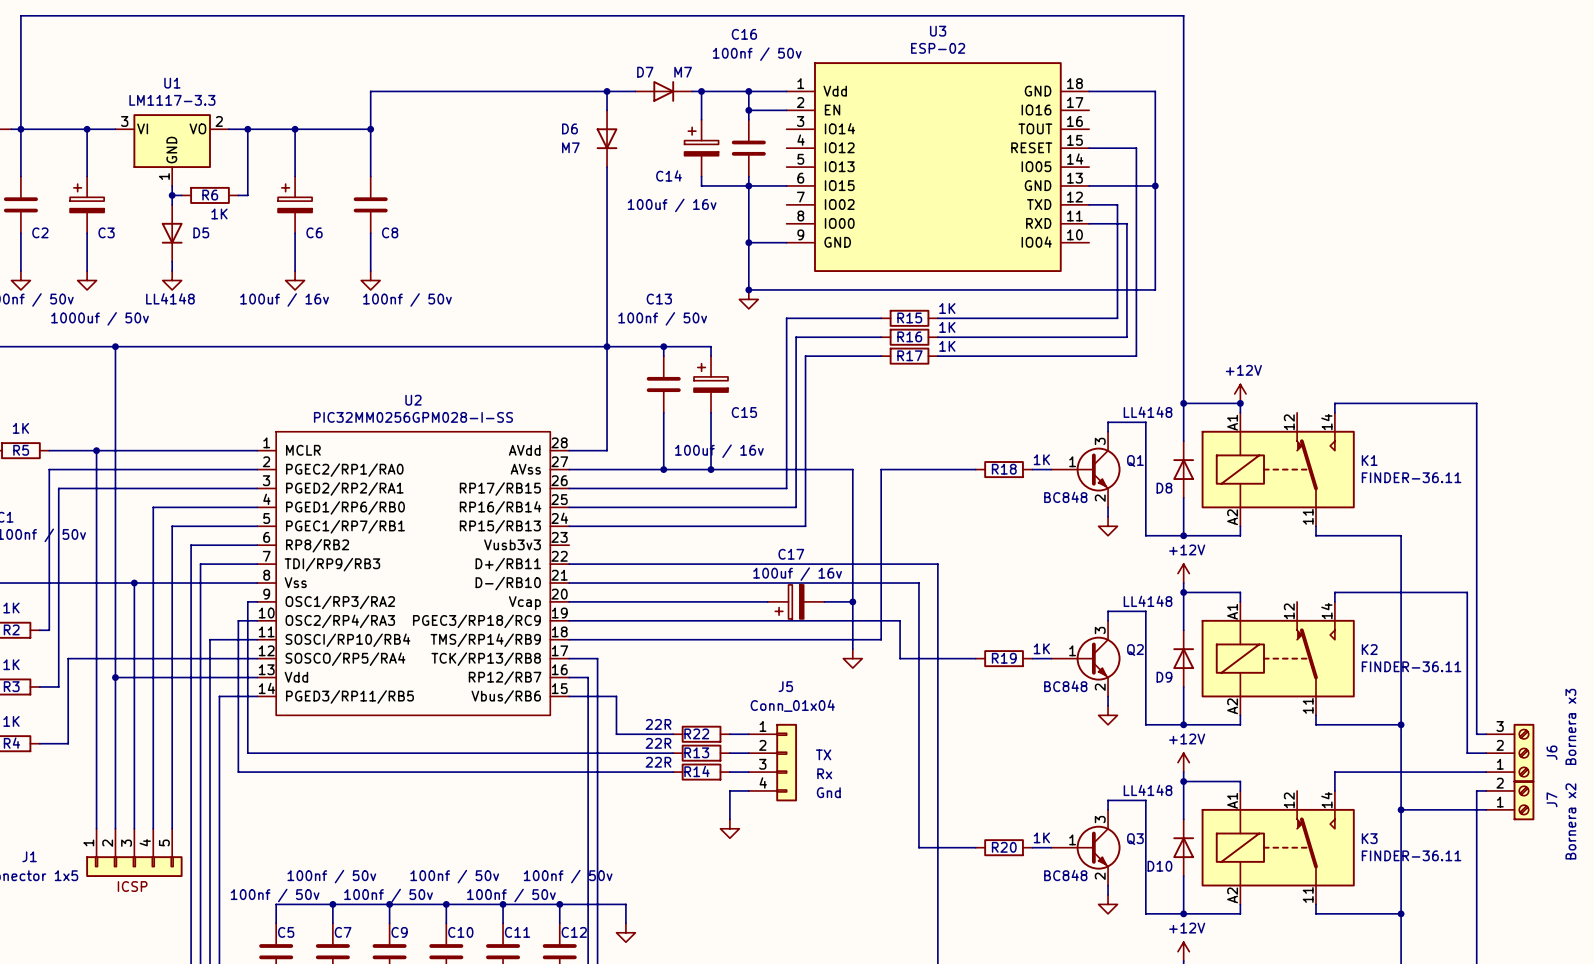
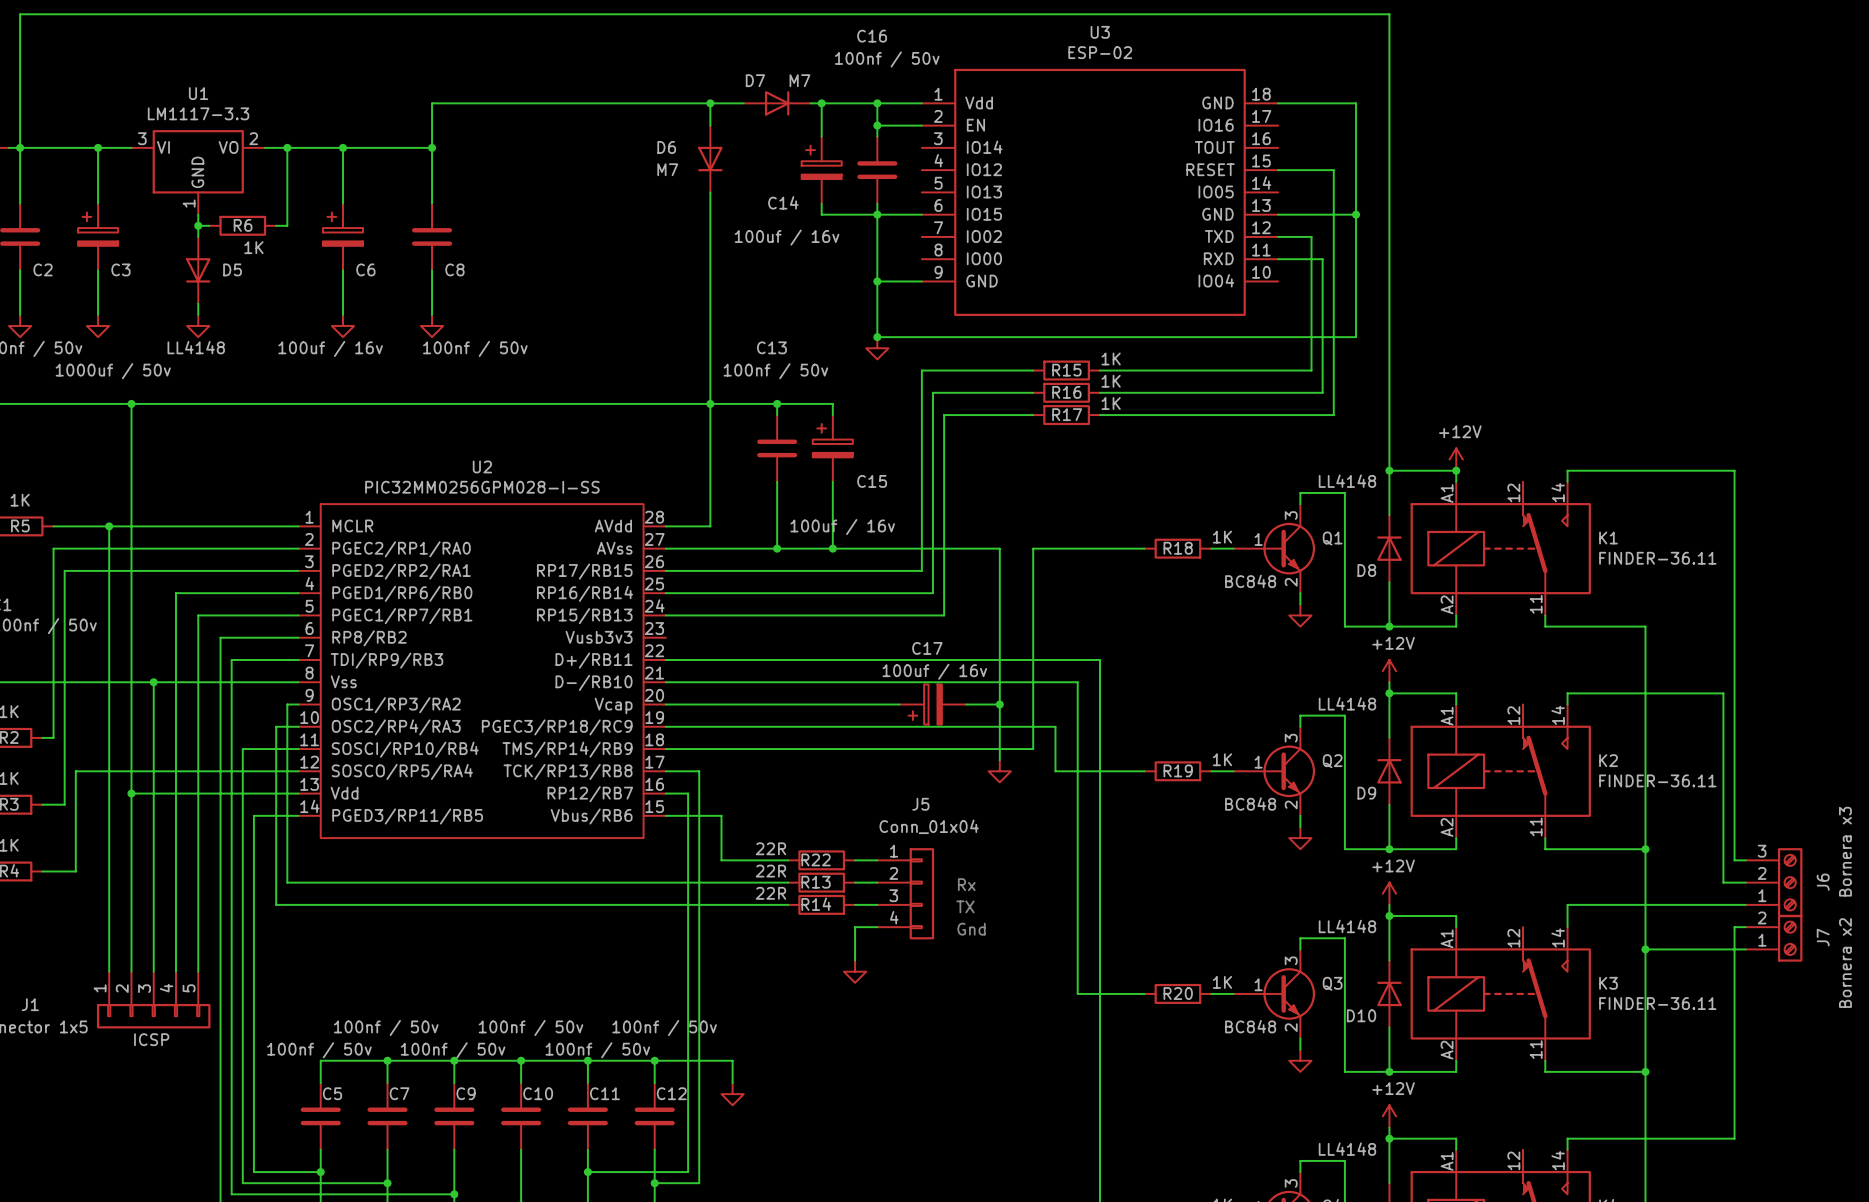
text: TX (823, 754) -> Rx (966, 884)
text: Rx (824, 773) -> TX (965, 906)

